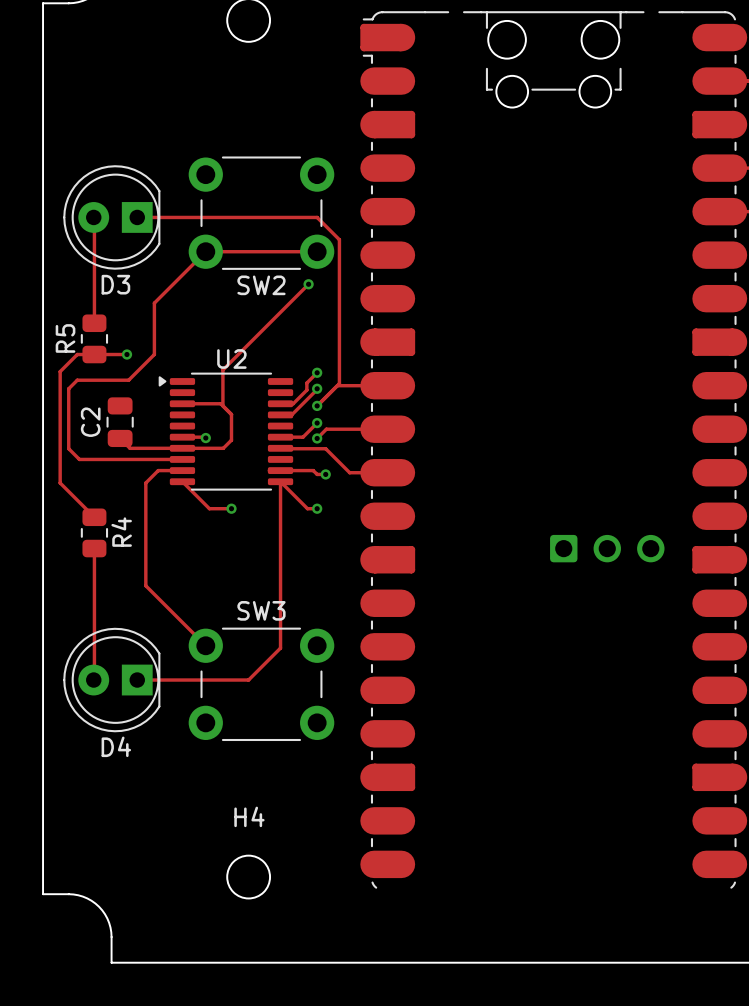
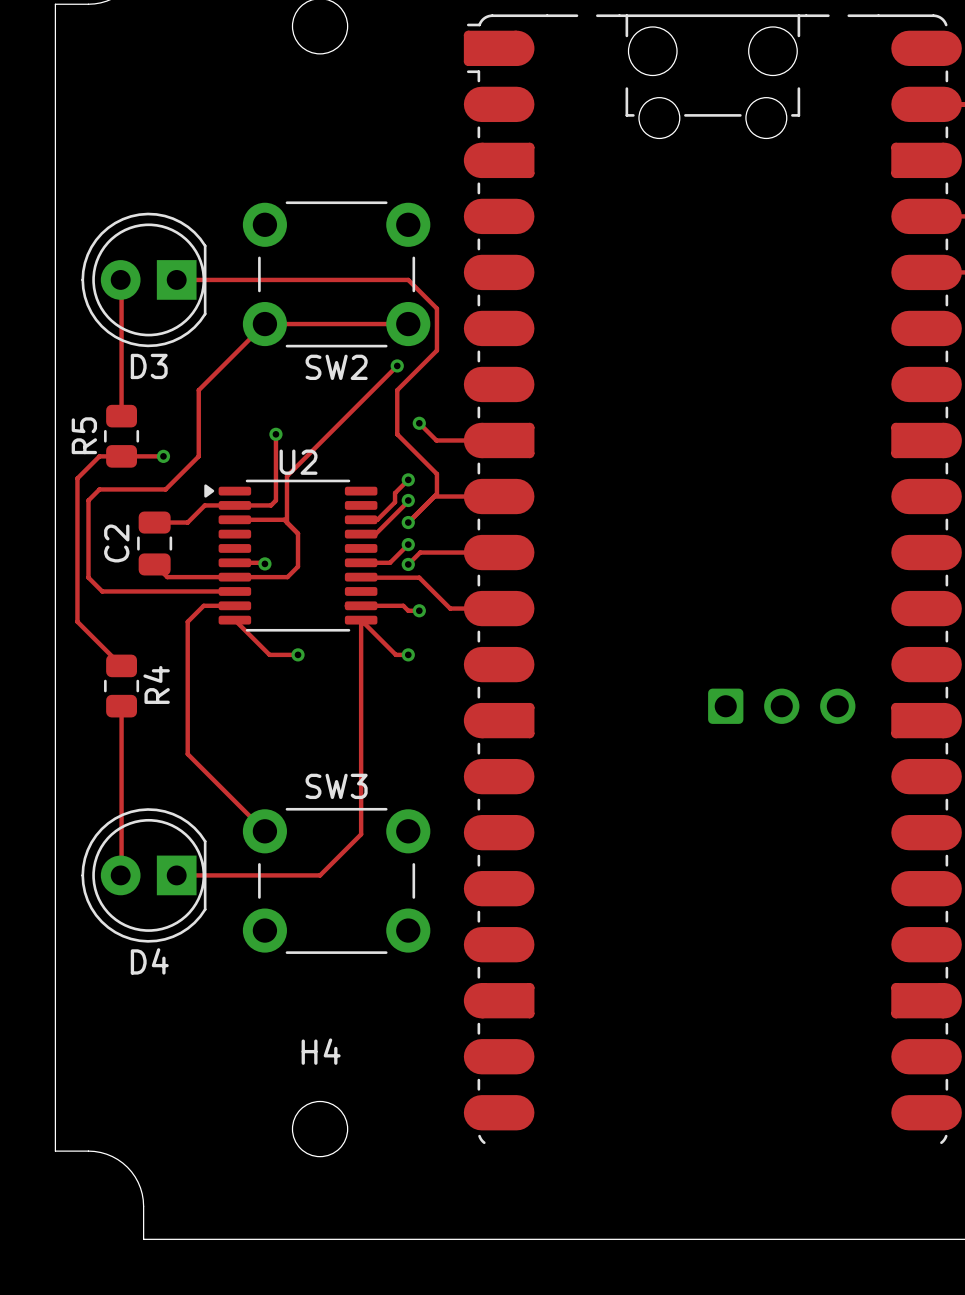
track: (339, 272) (339, 368) -> (436, 350) (397, 390) (397, 434) (436, 474)
track: none -> (419, 423) (436, 440) (499, 440)
via: none -> (419, 423)
track: none -> (275, 434) (275, 500) (270, 505) (204, 505) (187, 522) (154, 522)
via: none -> (275, 434)

